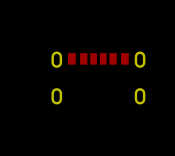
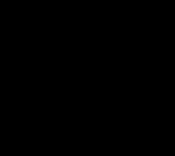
part: (98, 77) -> none

